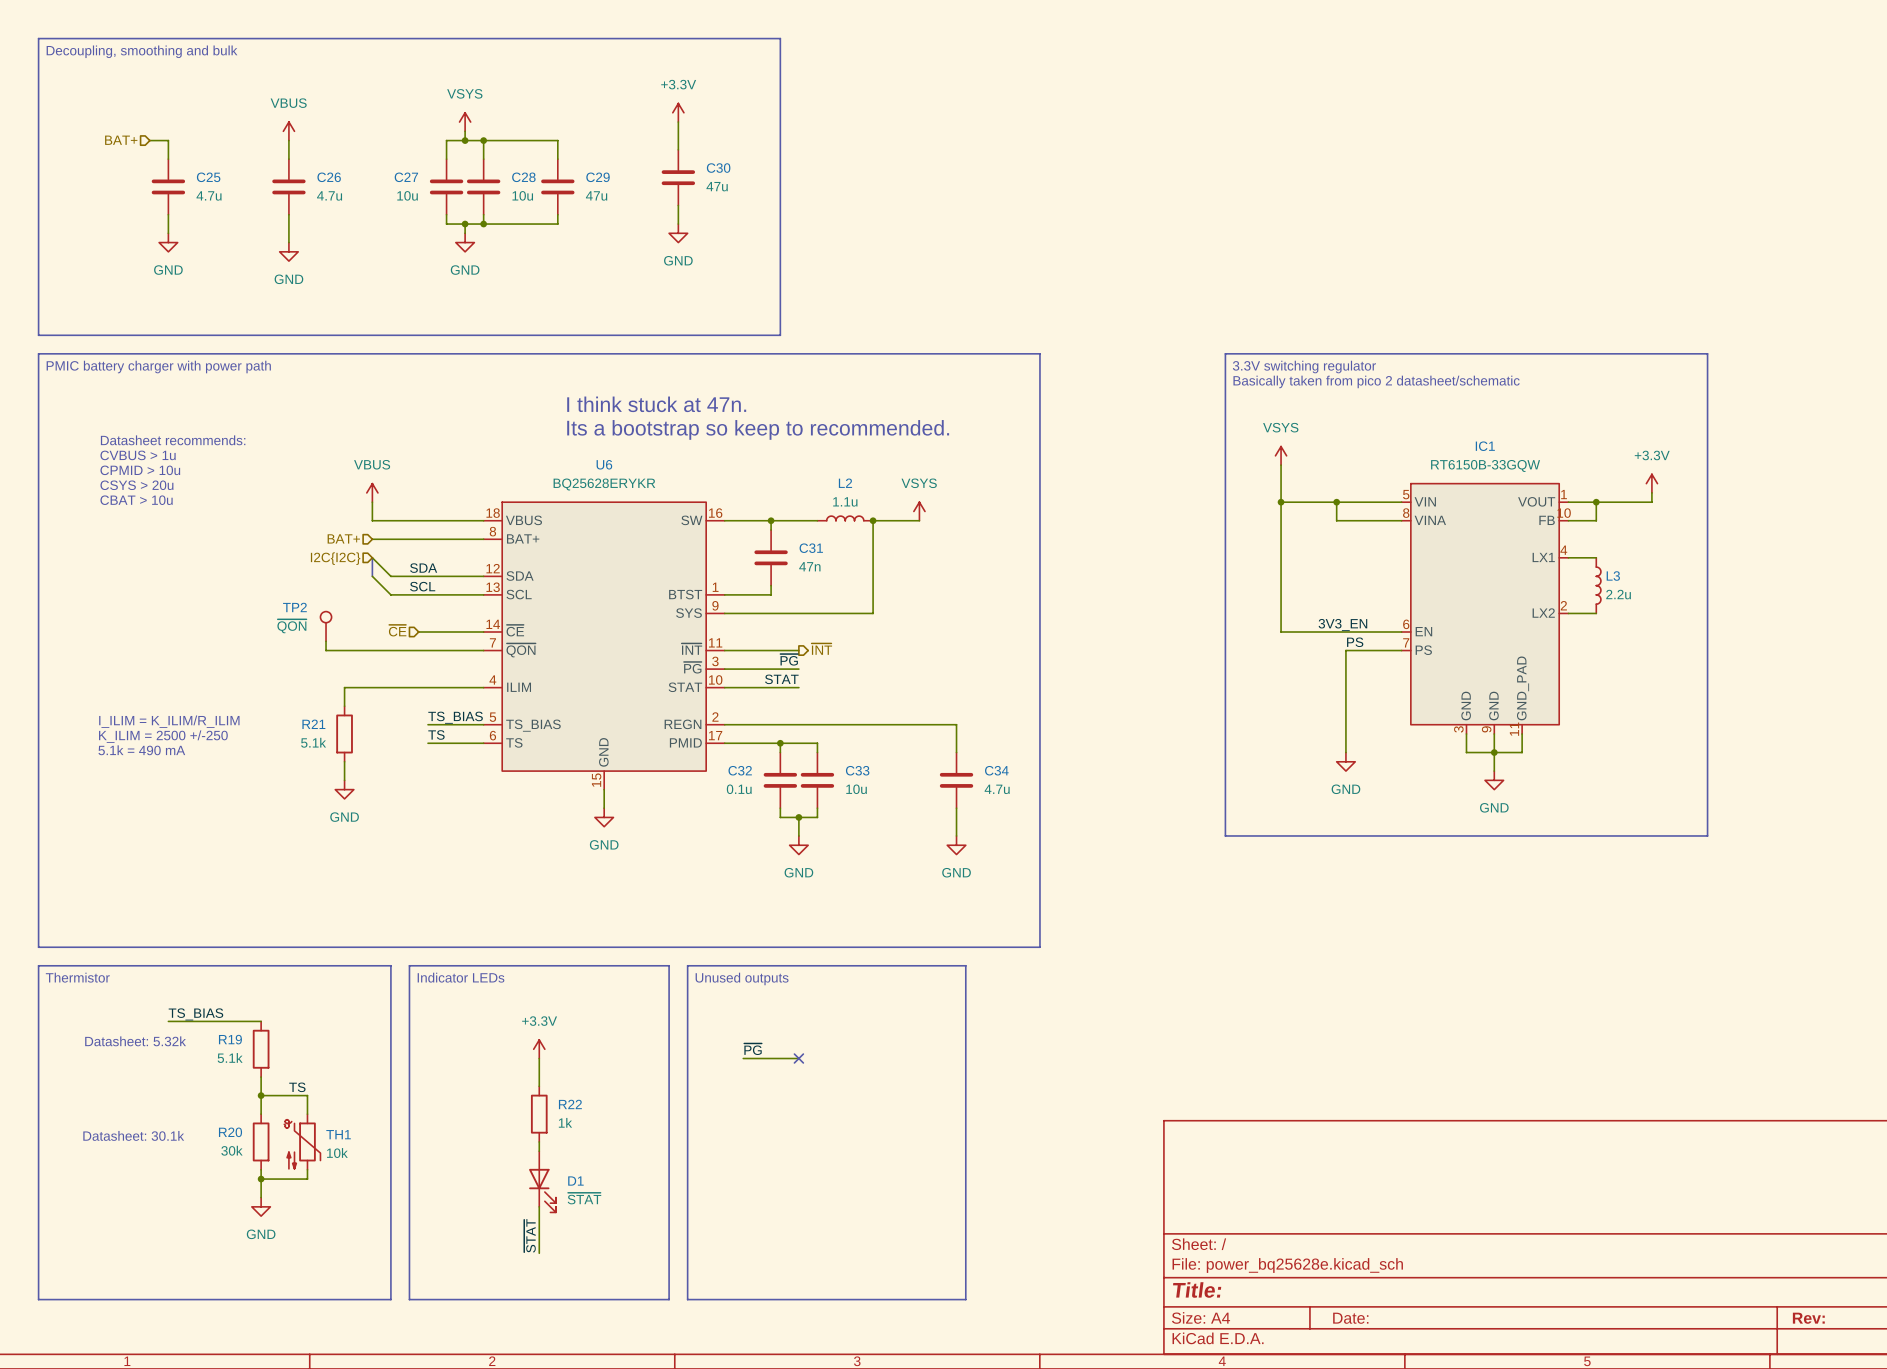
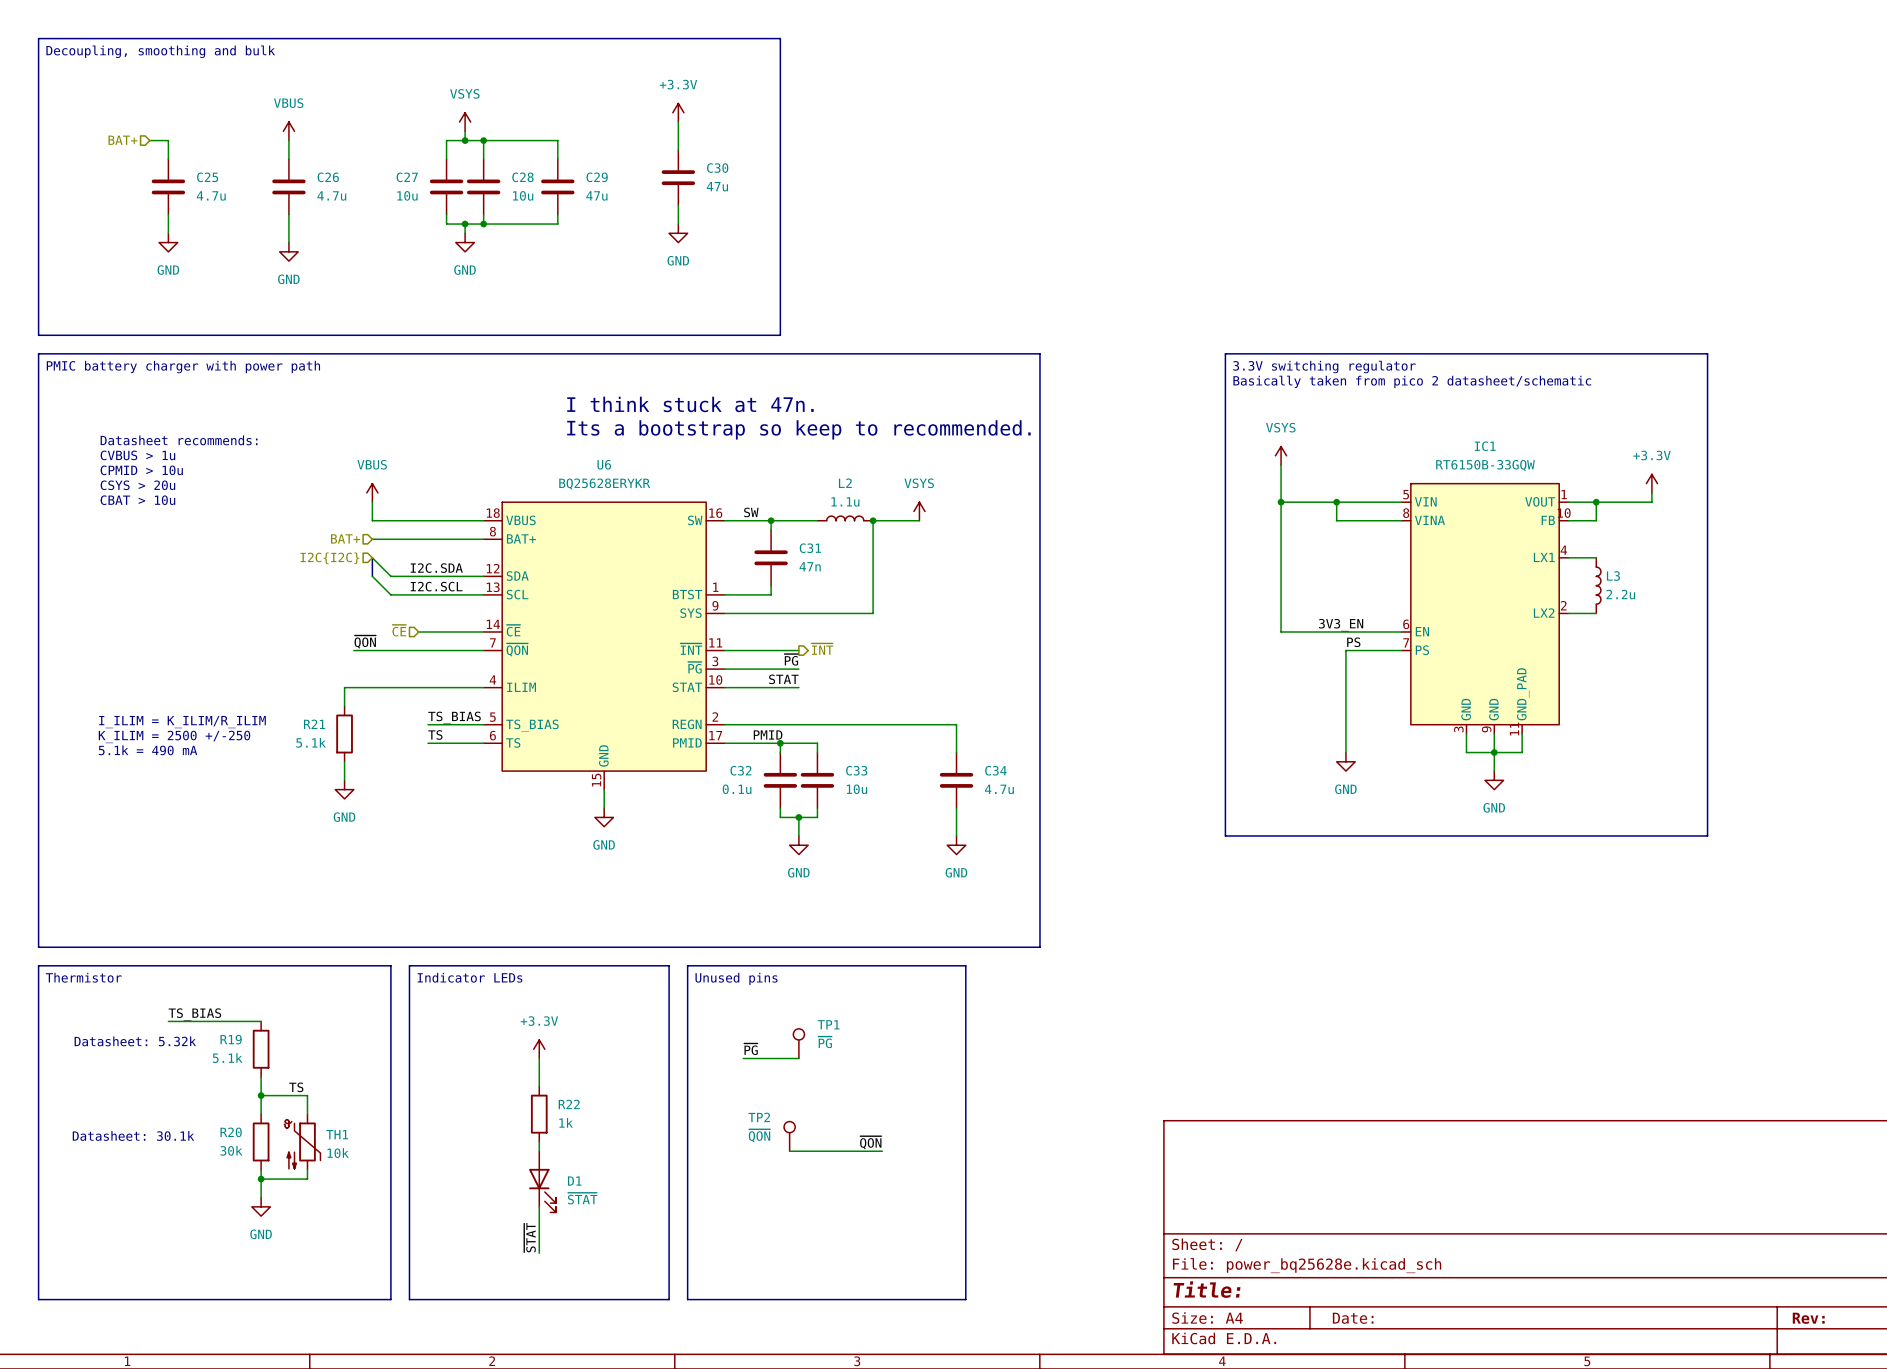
label: none -> SW (751, 512)
label: SDA (423, 568) -> I2C.SDA (436, 568)
label: SCL (422, 586) -> I2C.SCL (436, 586)
TP2 position: (326, 626) -> (789, 1136)
wire: (326, 641) (326, 650) (353, 650) -> none
label: none -> ~{QON} (365, 642)
label: none -> PMID (768, 734)
text: Unused outputs (742, 978) -> Unused pins (736, 978)
TP1: none -> ~{PG} (798, 1043)
no-connect mark: (798, 1058) -> none
label: none -> ~{QON} (870, 1142)
wire: none -> (789, 1151) (882, 1151)

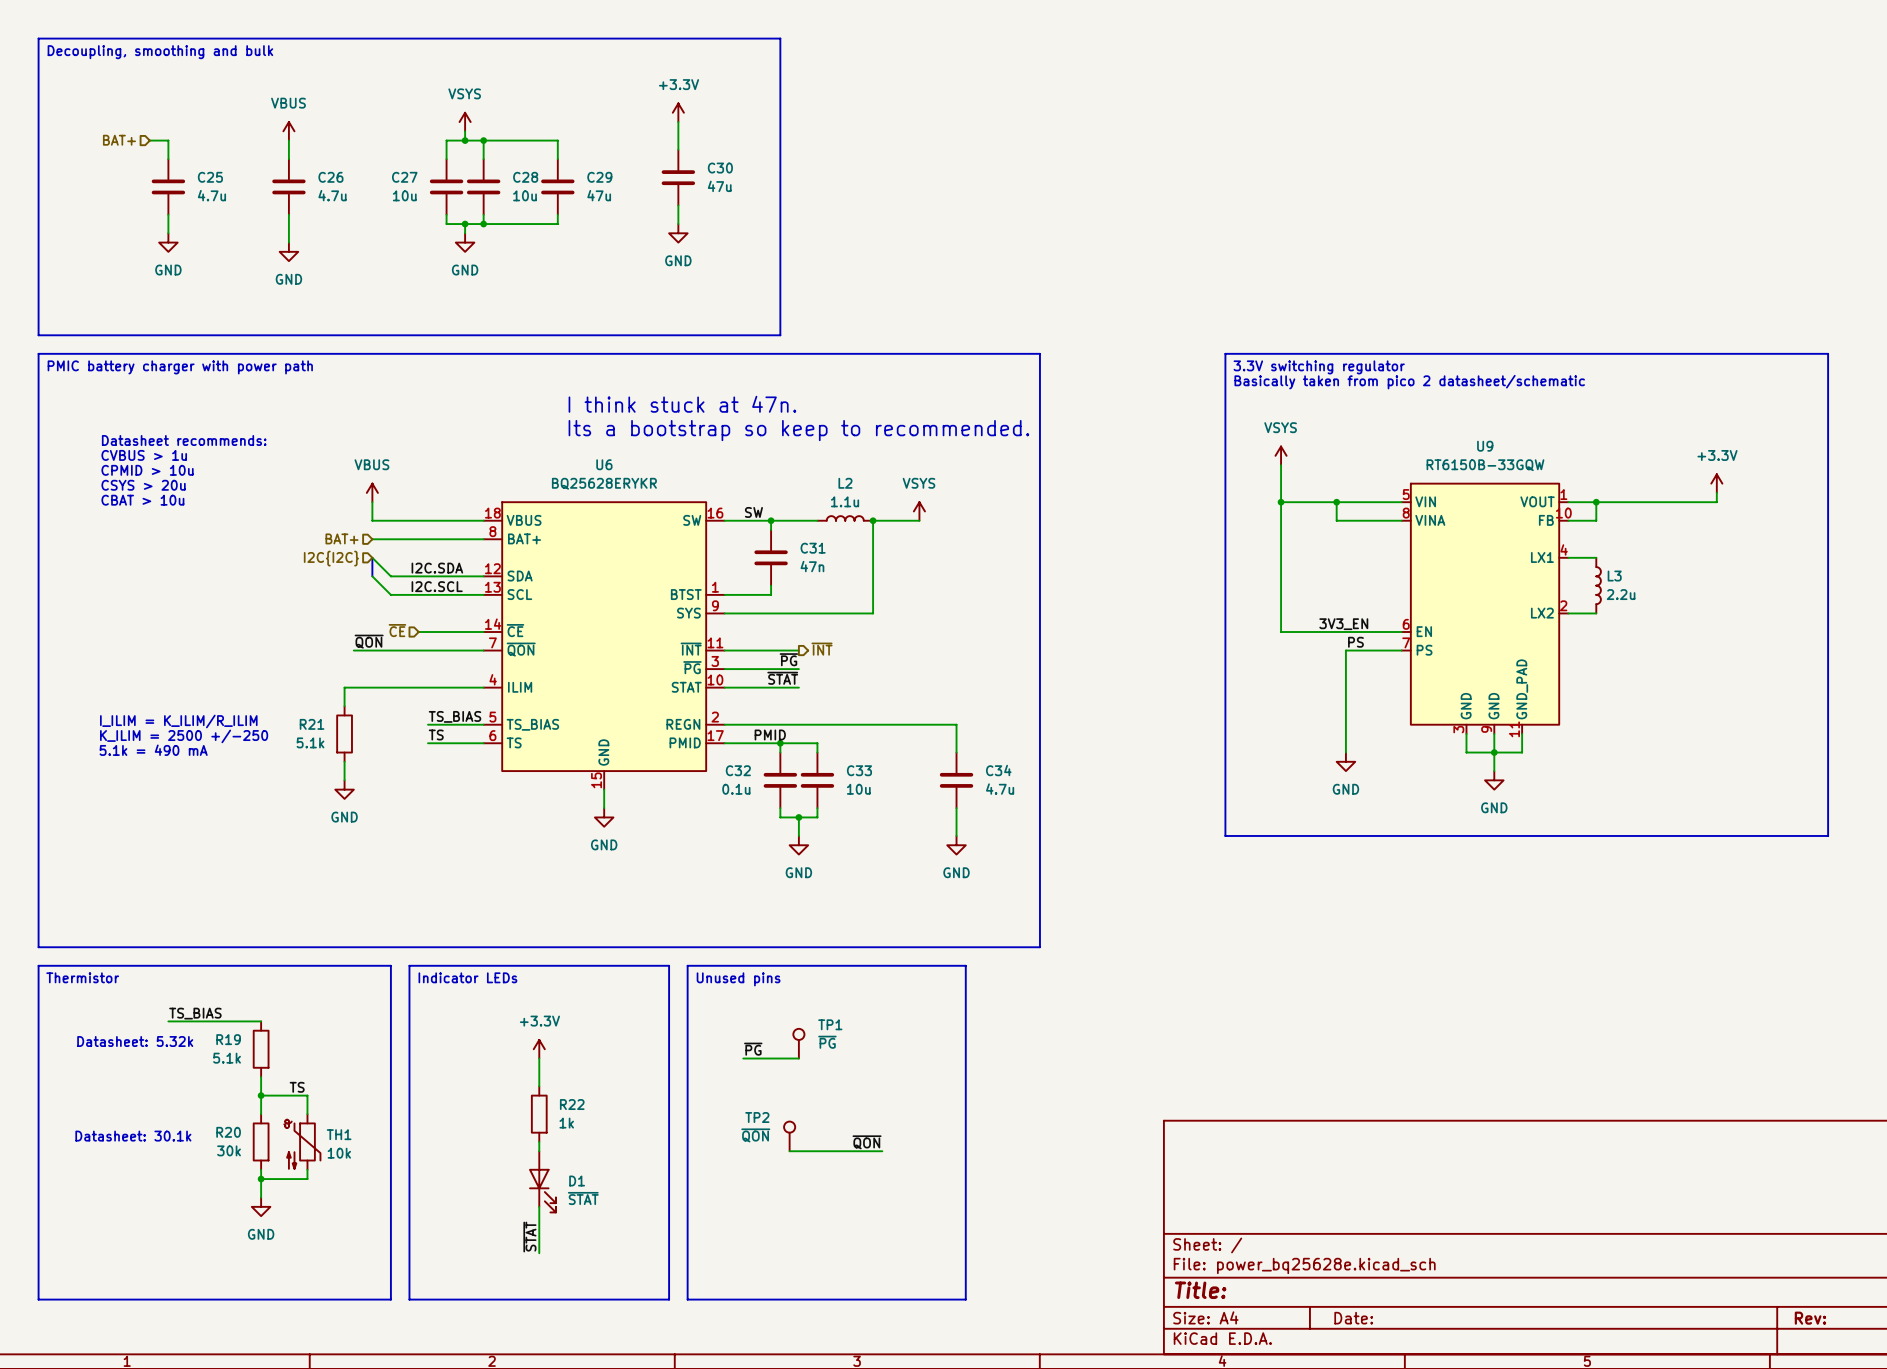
line: (1707, 353) (1707, 835) -> (1707, 353) (1828, 353) (1828, 835) (1707, 835)
IC1 name: IC1 (1485, 446) -> U9 (1485, 446)
power symbol position: +3.3V (1651, 483) -> +3.3V (1716, 483)
wire: (1651, 492) (1651, 502) -> (1716, 492) (1716, 502) (1651, 502)
label: STAT (783, 679) -> ~{STAT} (782, 678)

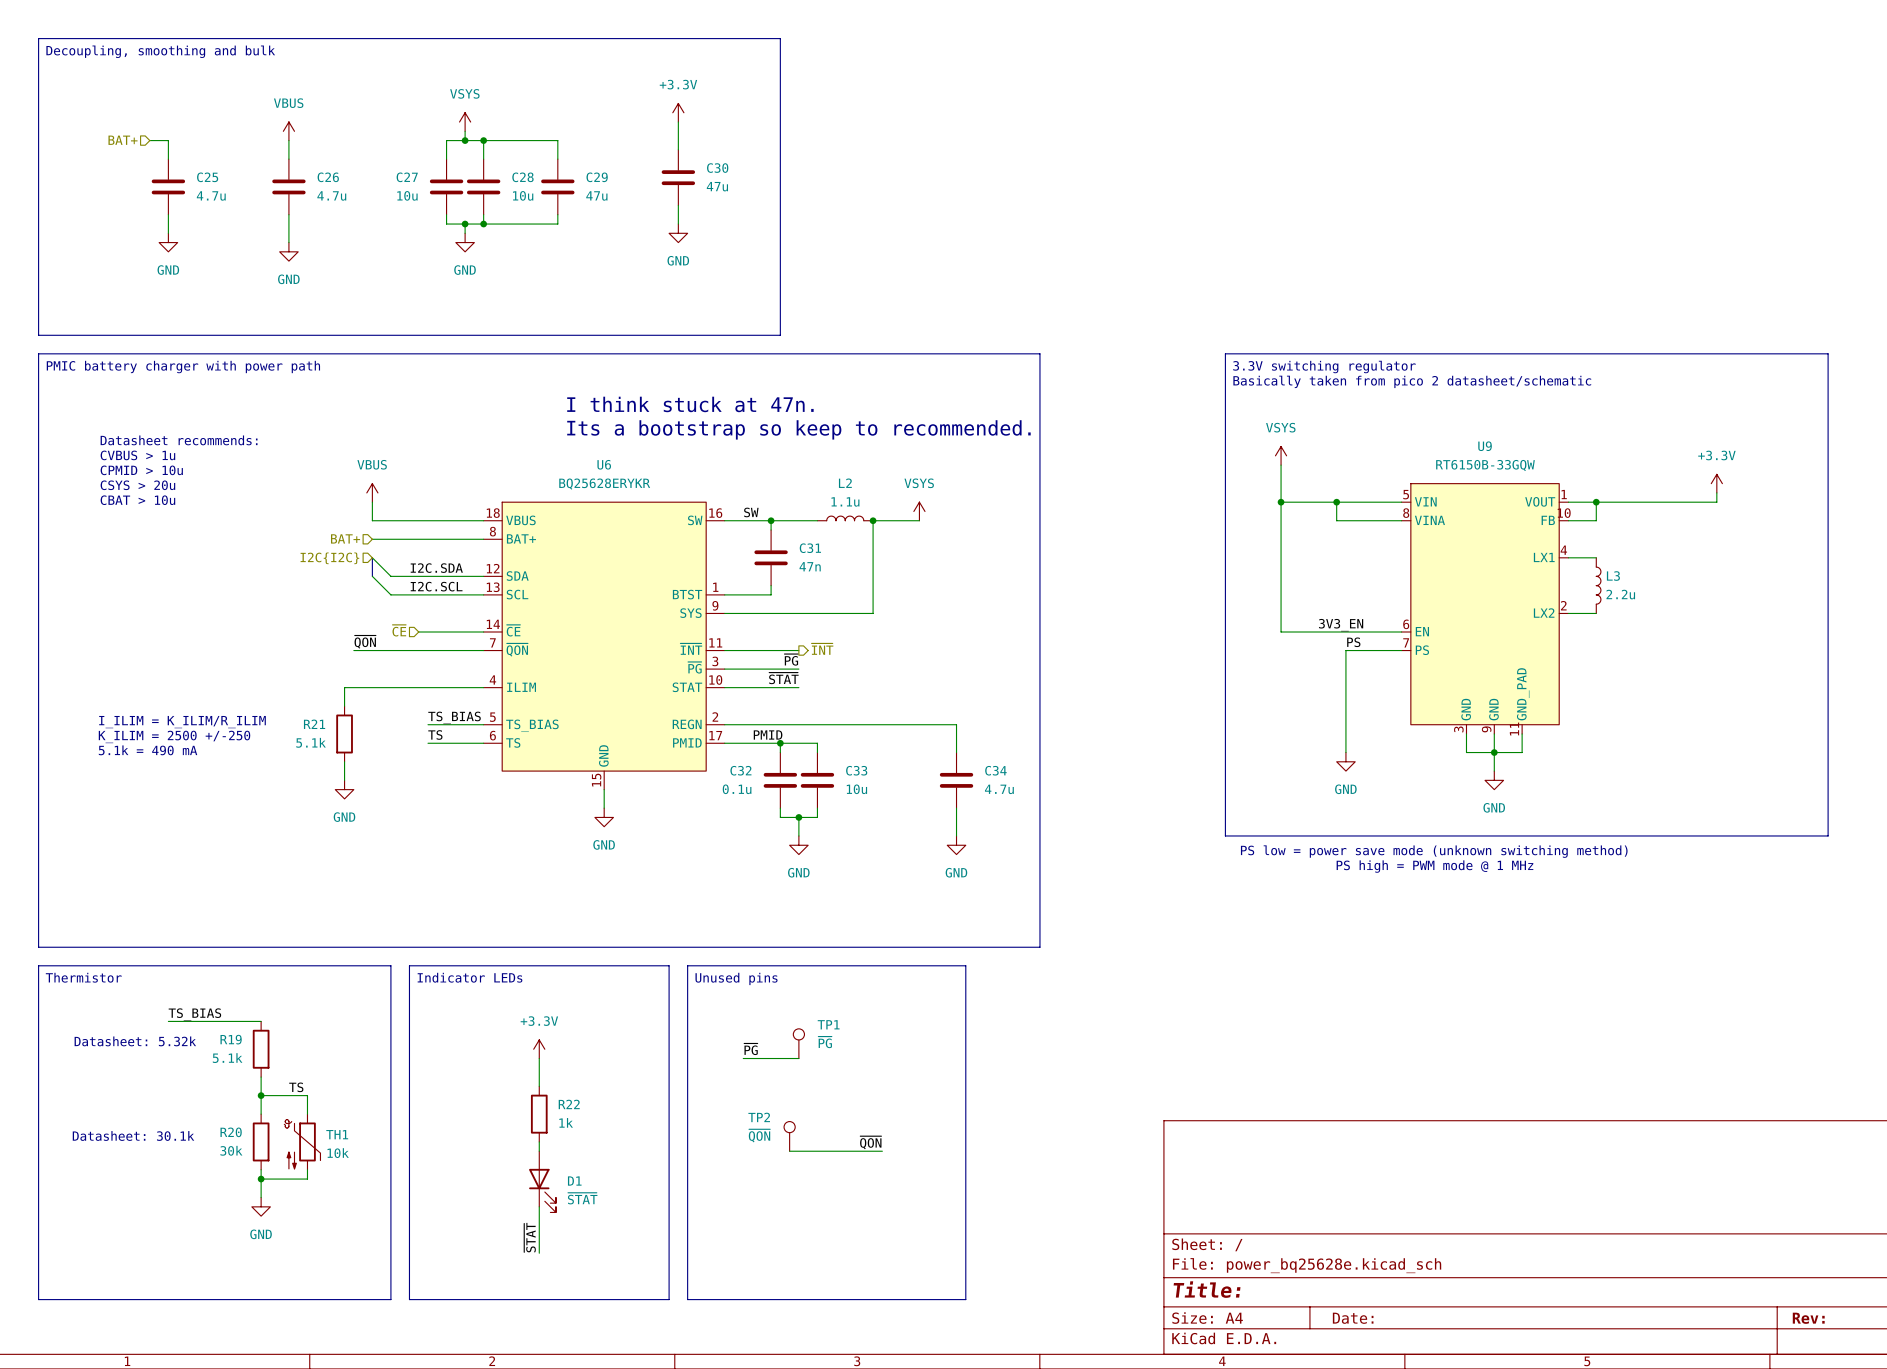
text: none -> PS low = power save mode (unknown switching method) (1434, 851)
text: none -> PS high = PWM mode @ 1 MHz (1434, 866)

